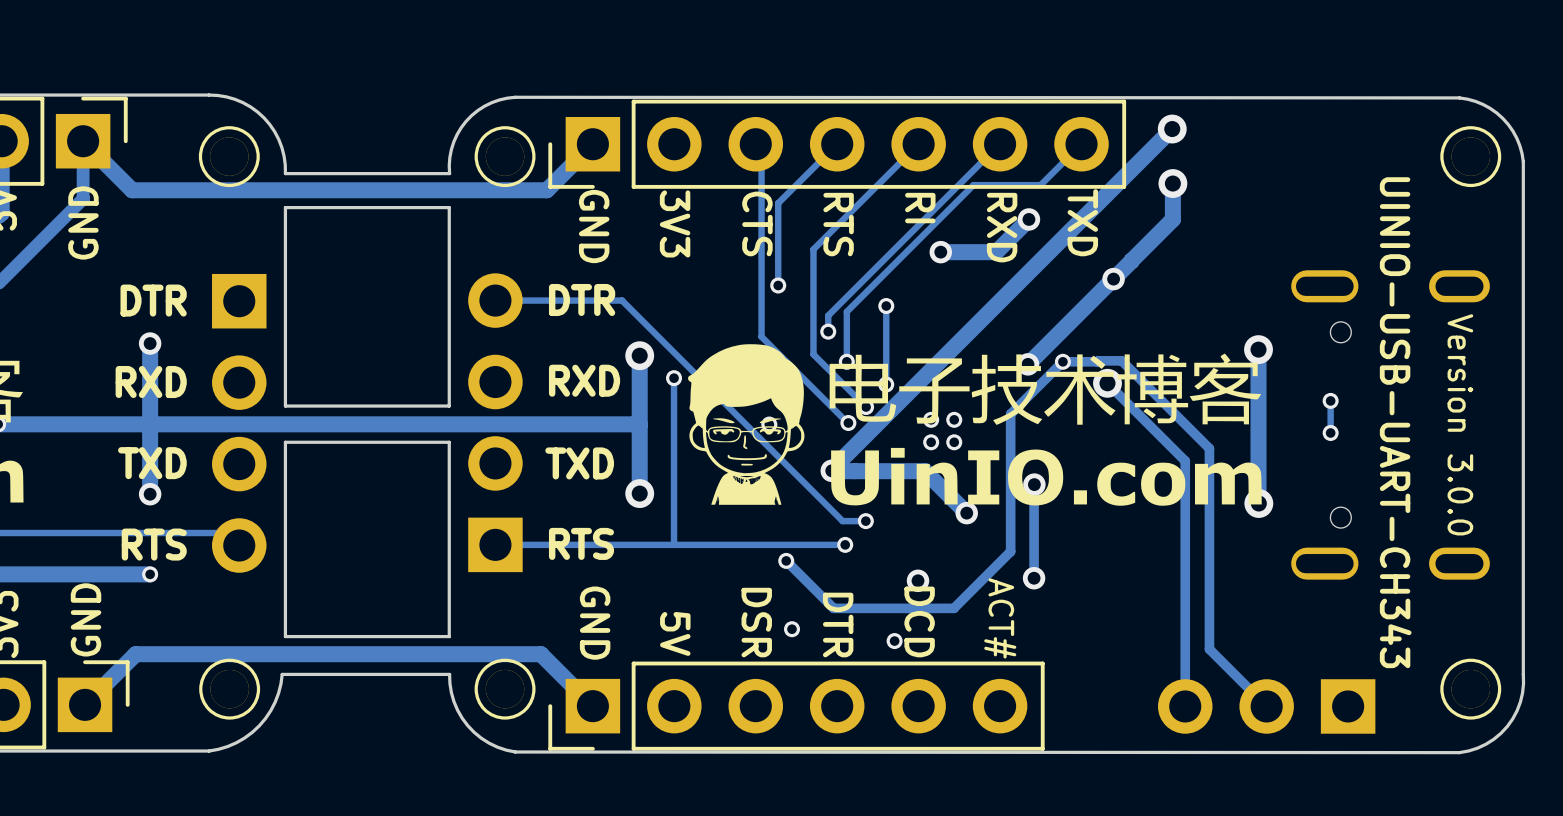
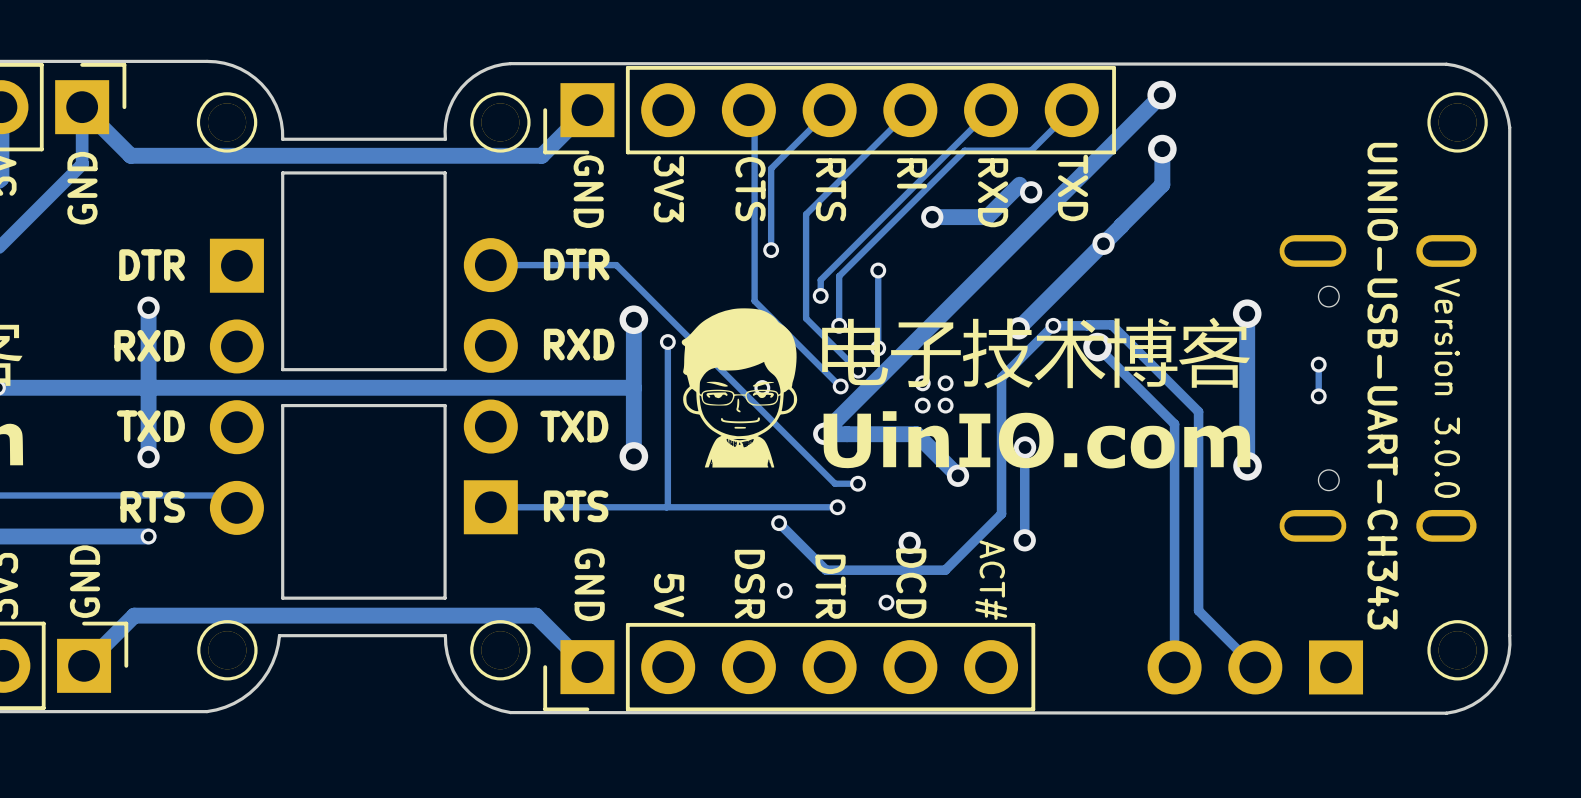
via position: (1028, 219) -> (1031, 192)

